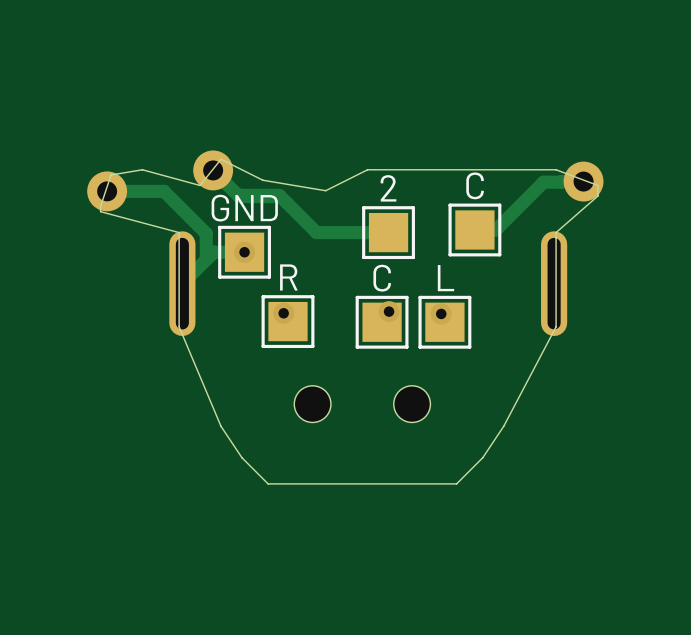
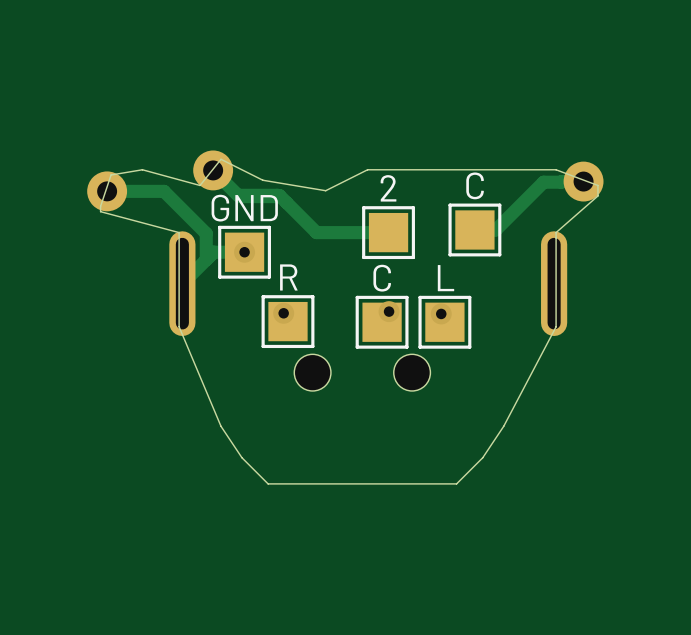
part position: (362, 404) -> (362, 372)

